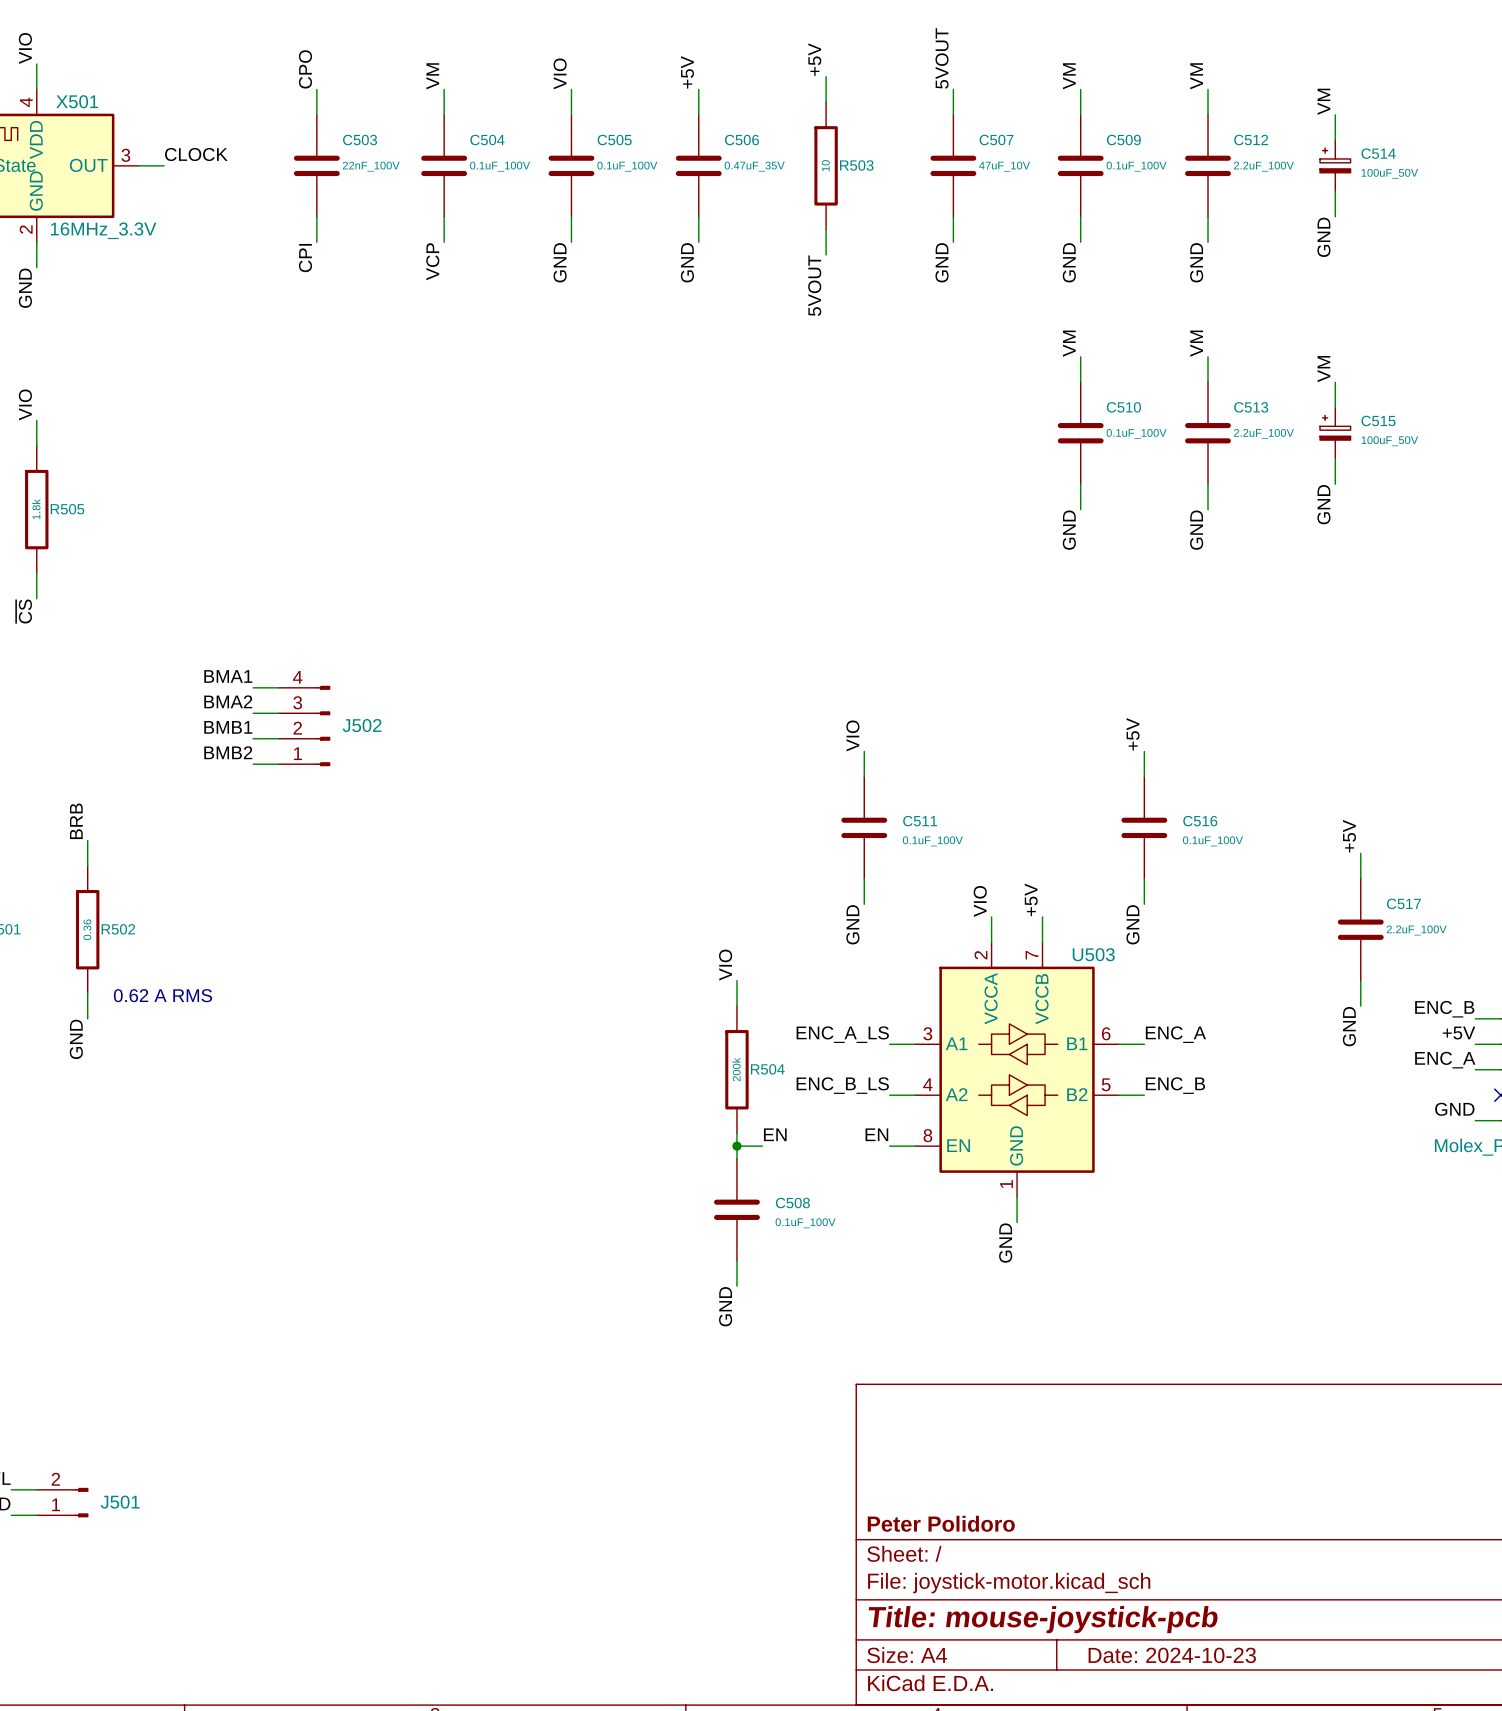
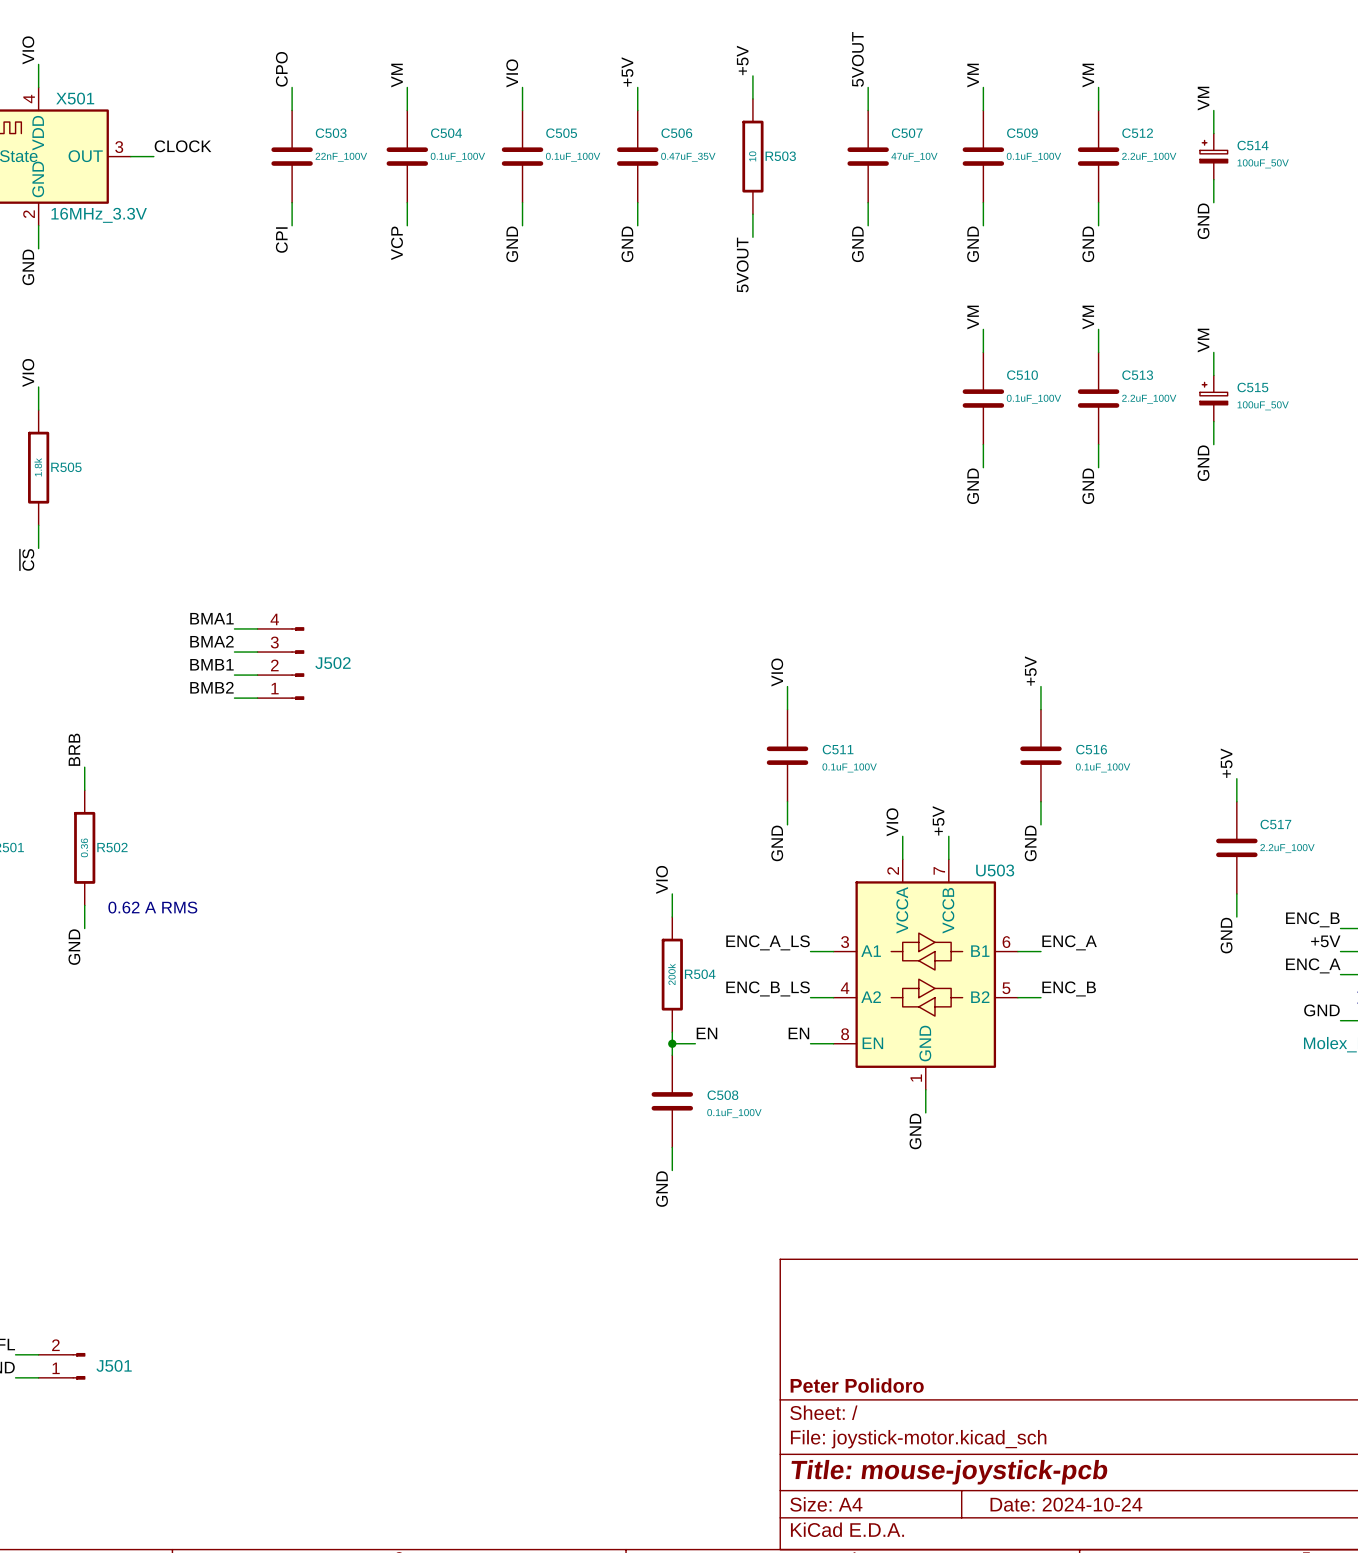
title block: Date: 2024-10-23 (1172, 1655) -> Date: 2024-10-24 (1066, 1504)

